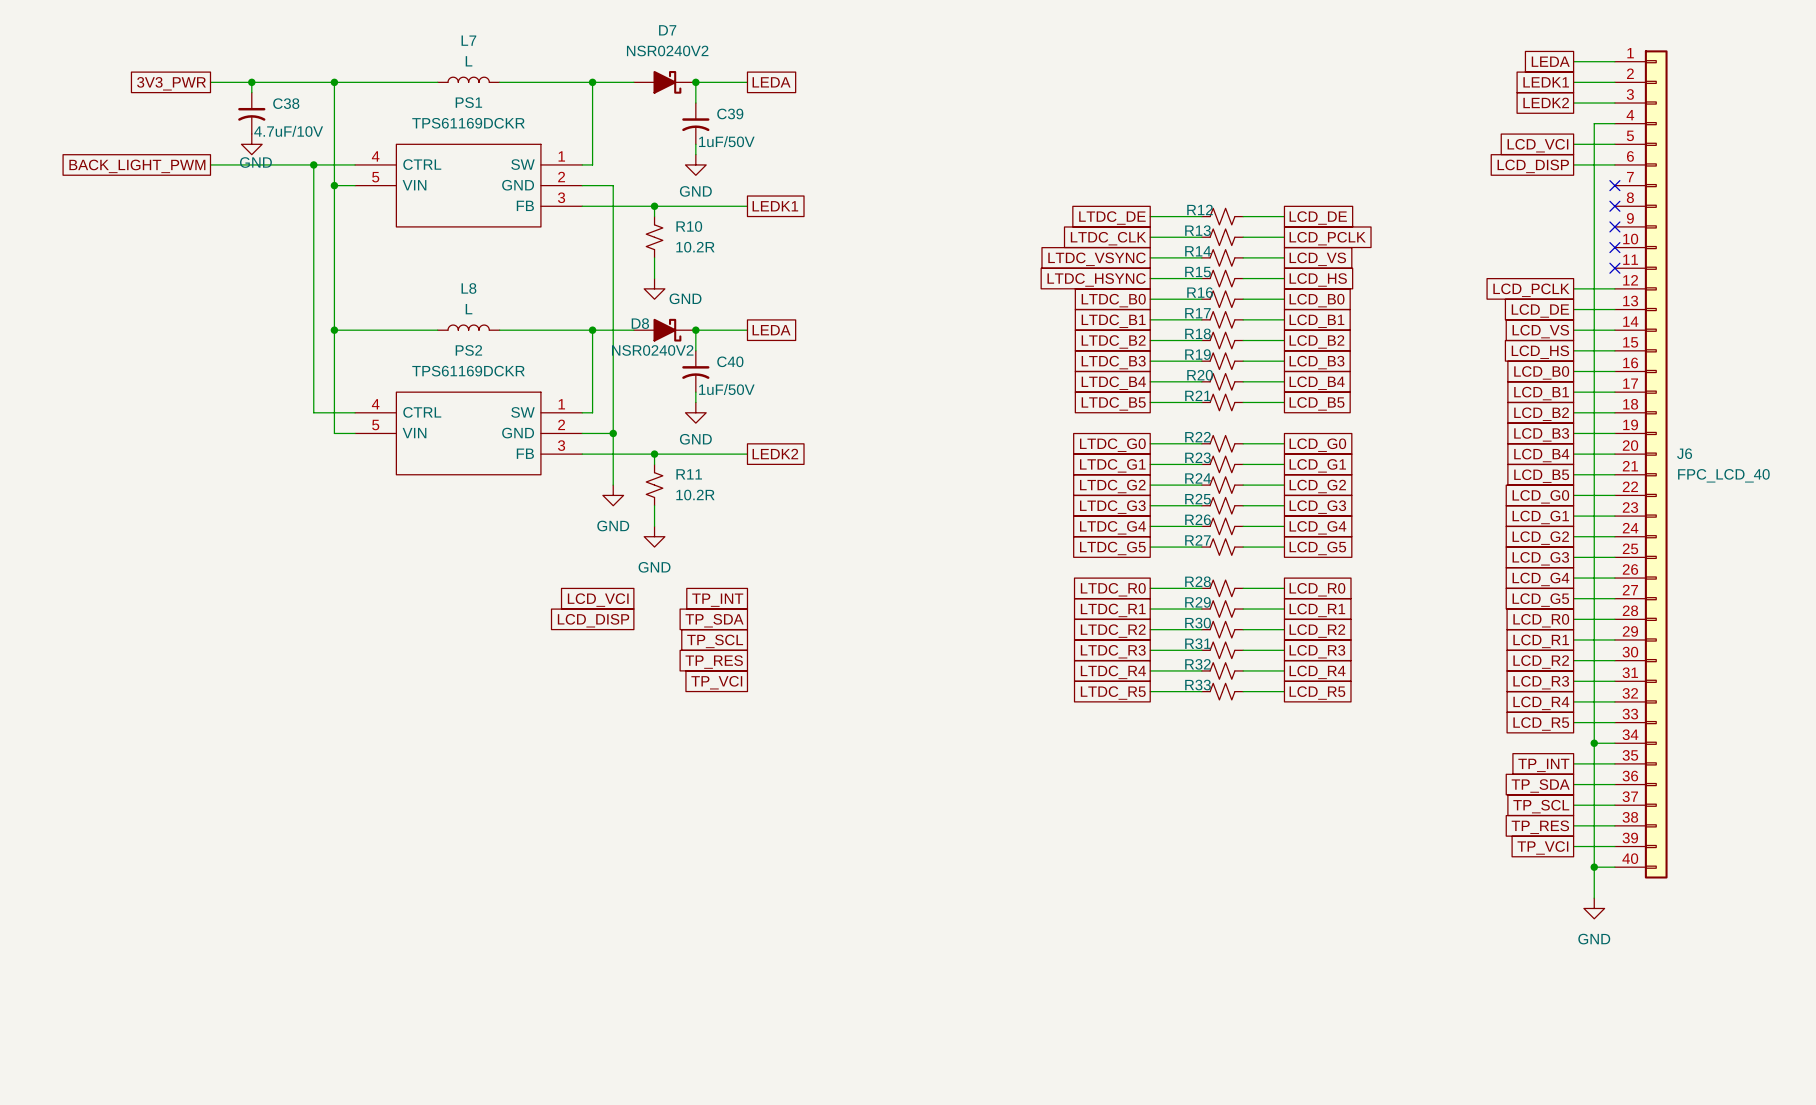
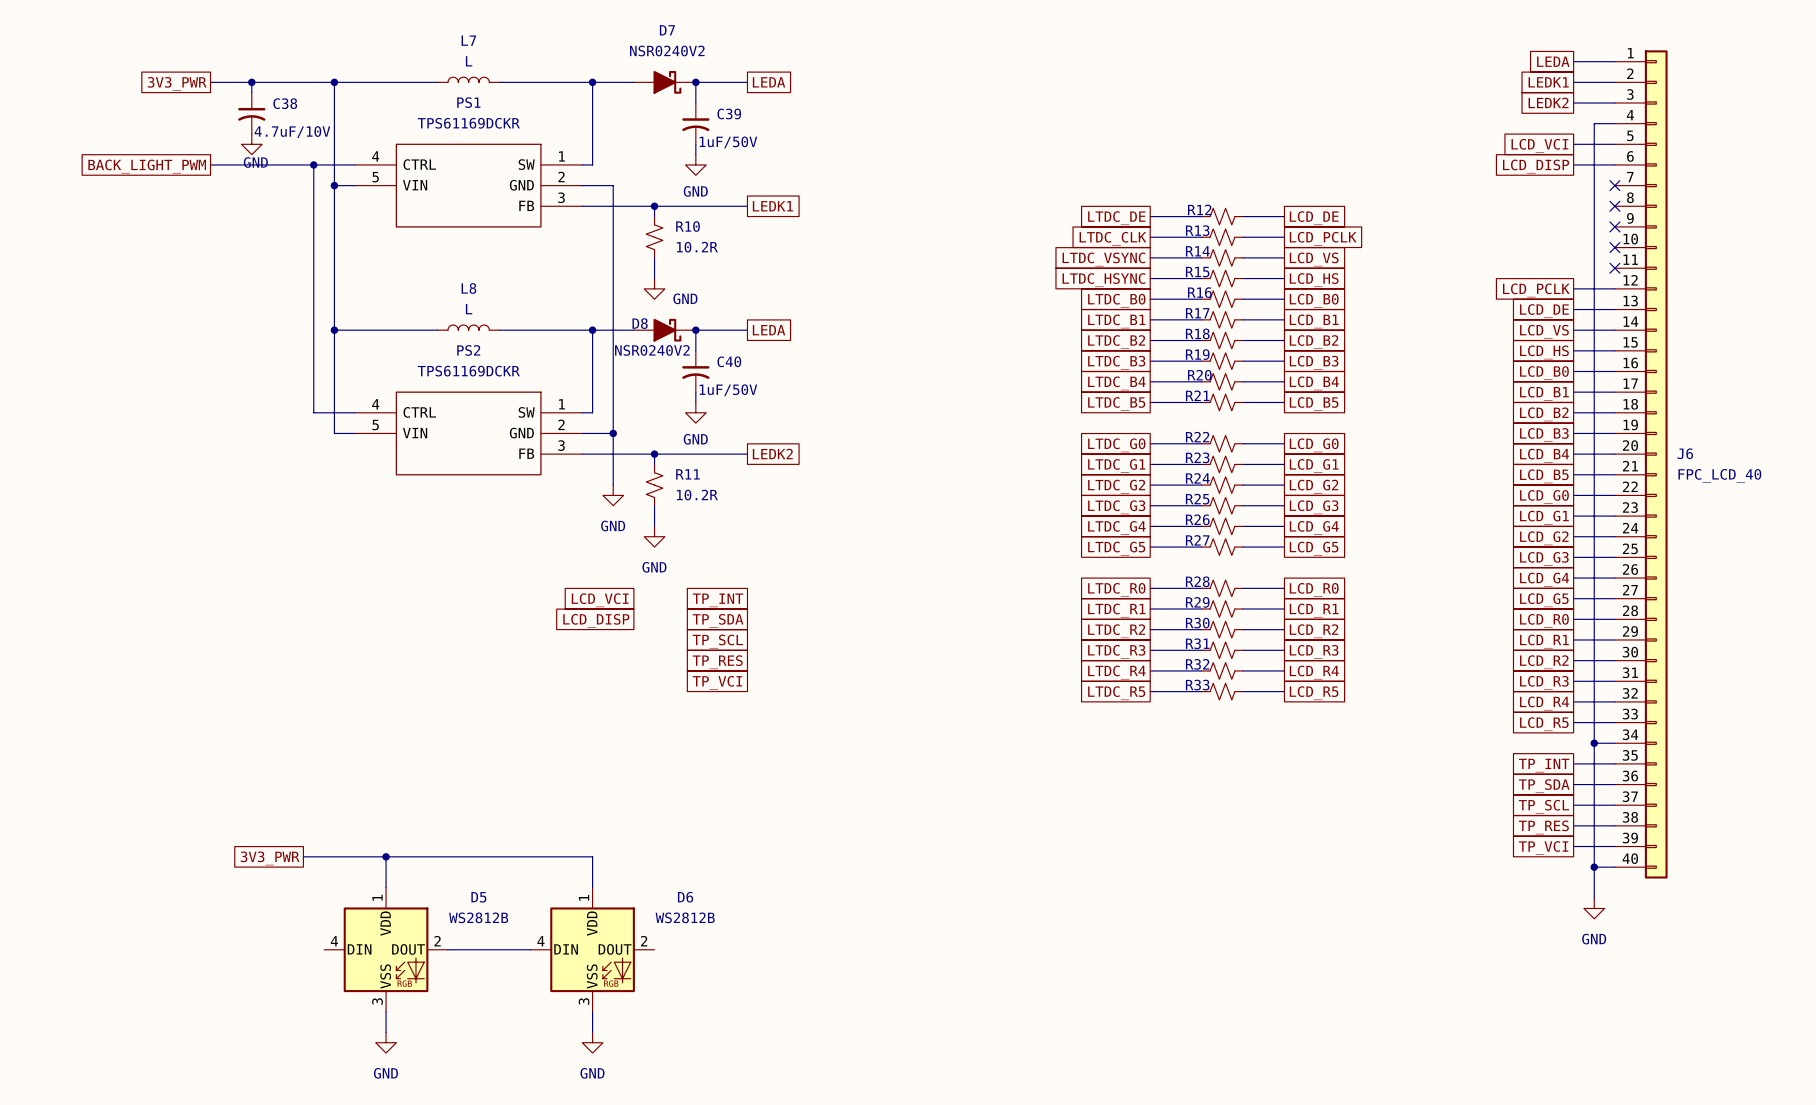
wire: none -> (303, 856) (592, 856) (592, 887)
wire: none -> (386, 856) (386, 887)
junction: none -> (386, 856)
global label: none -> 3V3_PWR (270, 858)
D5: none -> WS2812B (386, 949)
wire: none -> (448, 949) (530, 949)
D6: none -> WS2812B (592, 949)
wire: none -> (386, 1011) (386, 1032)
wire: none -> (592, 1011) (592, 1032)
power symbol: none -> GND (386, 1042)
power symbol: none -> GND (592, 1042)

